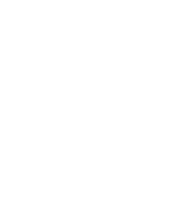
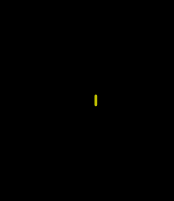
board edge: none -> (95, 95) (95, 104)

